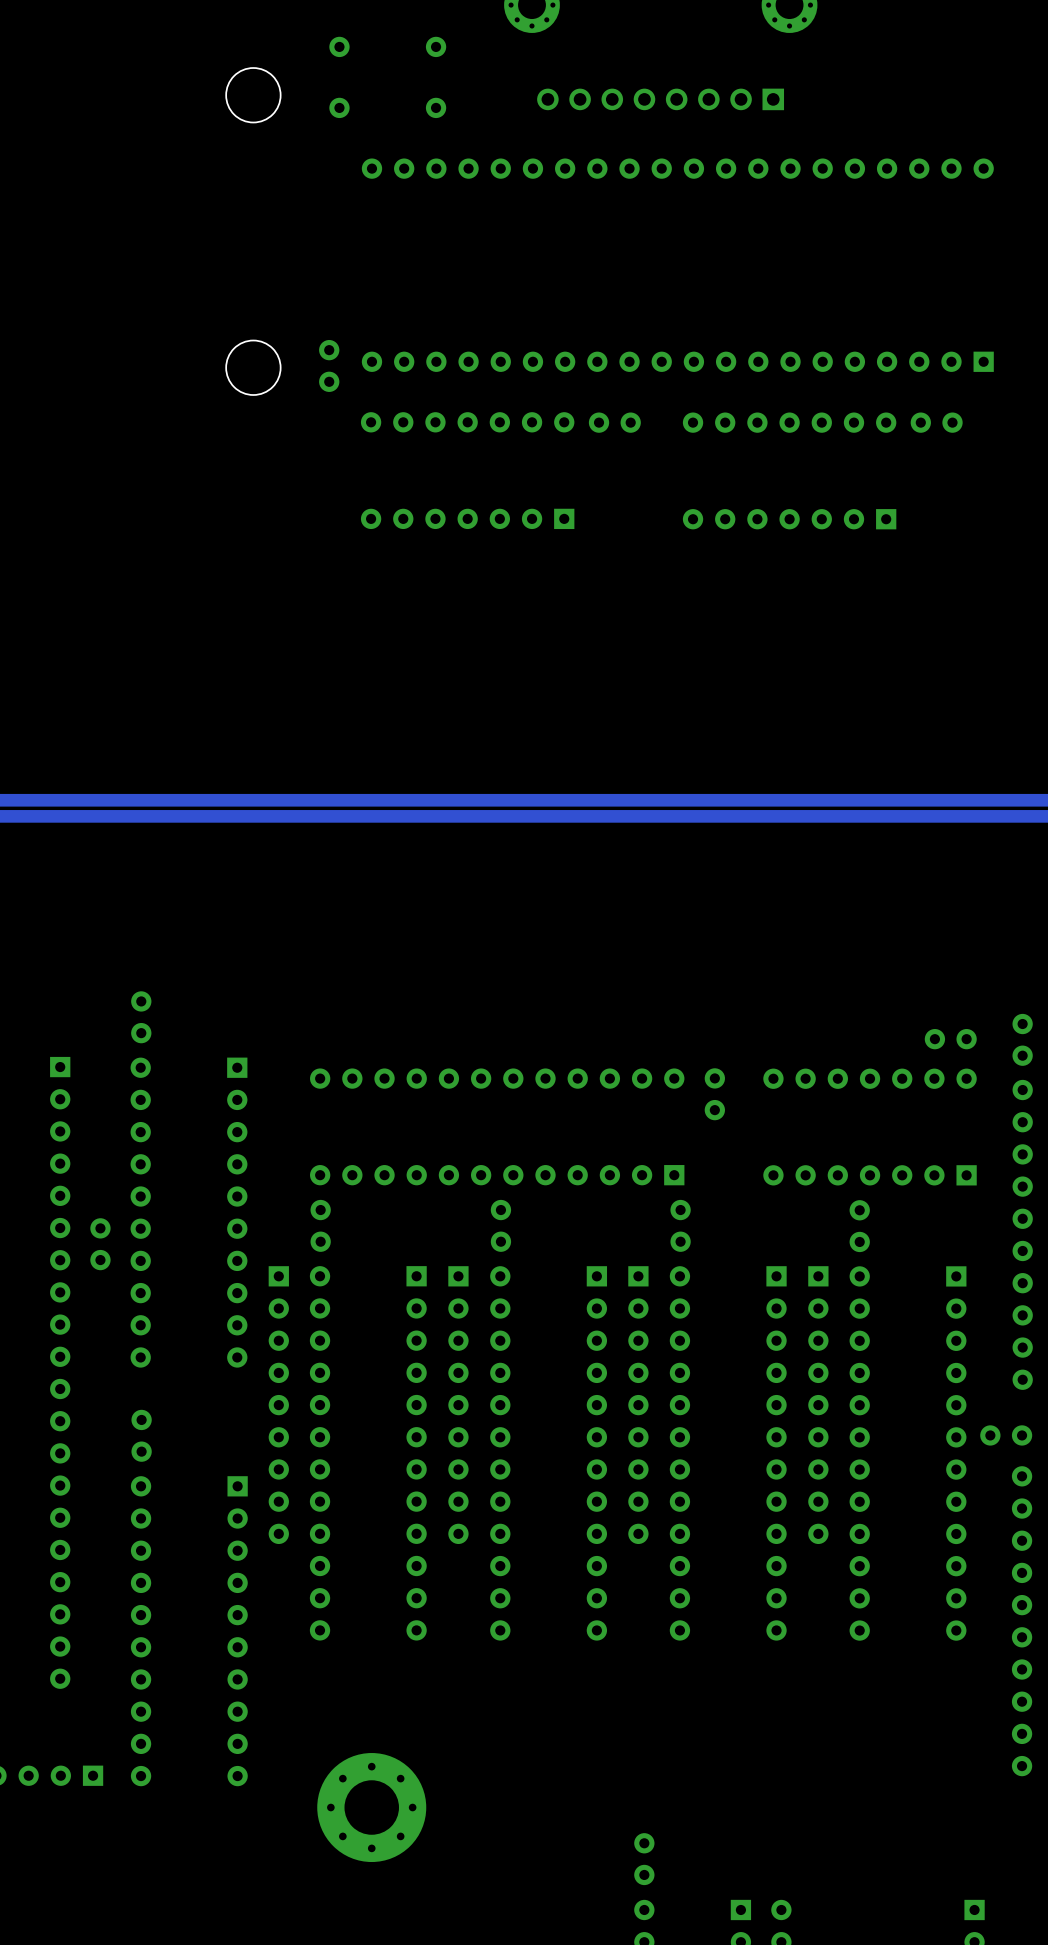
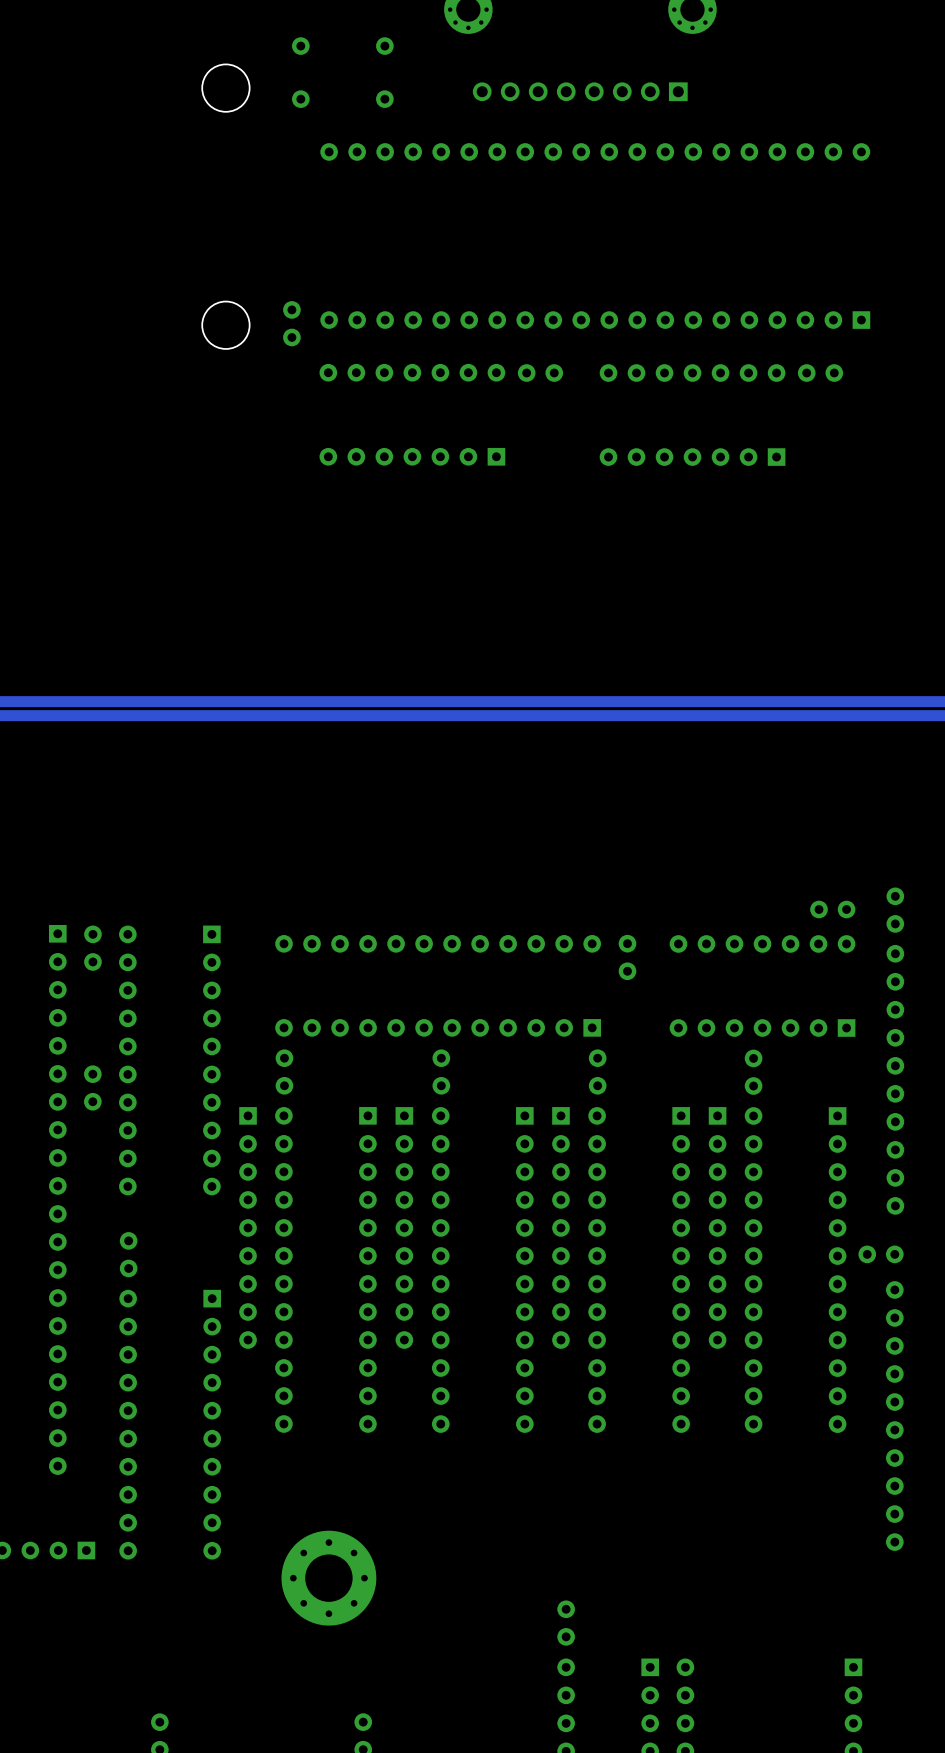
part position: (141, 1017) -> (92, 948)

